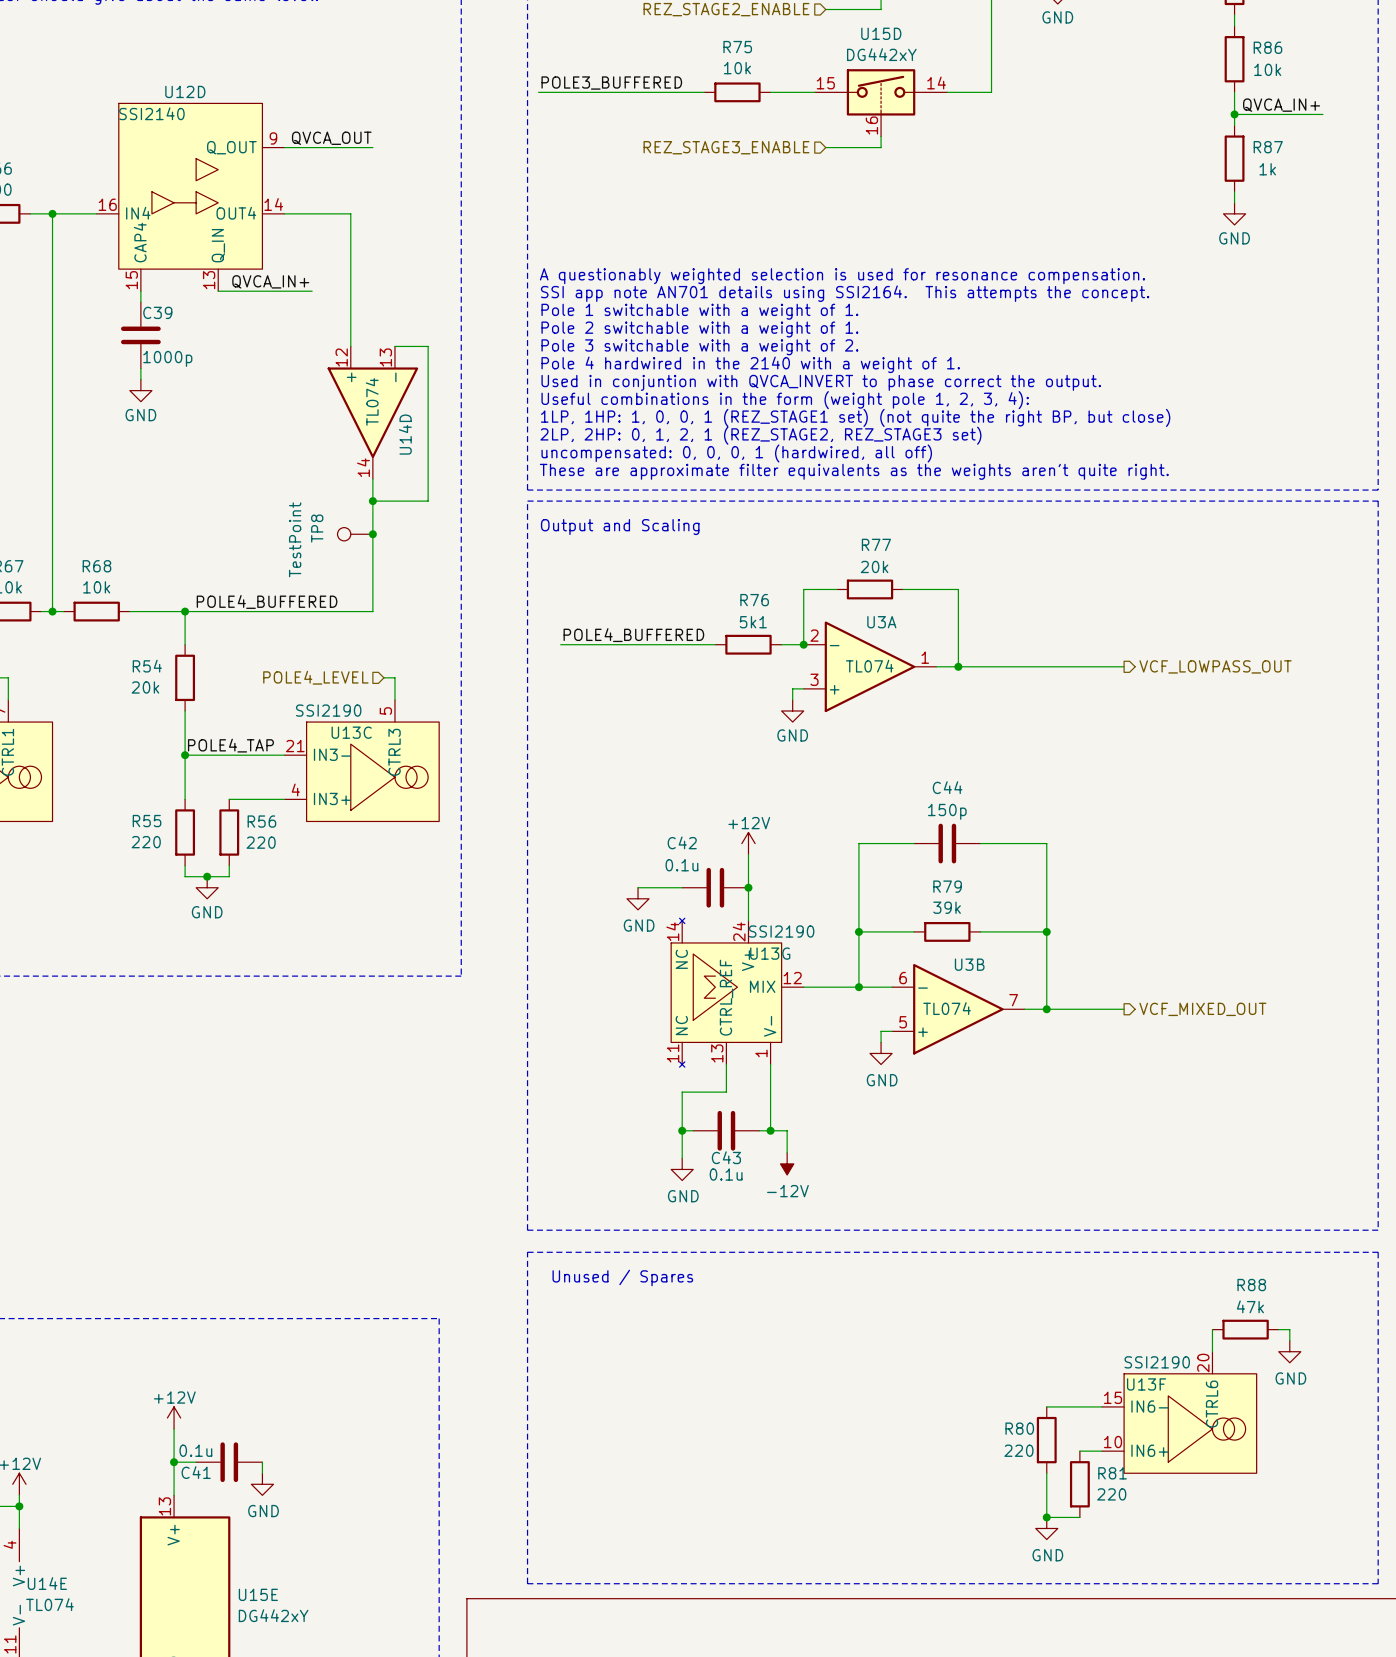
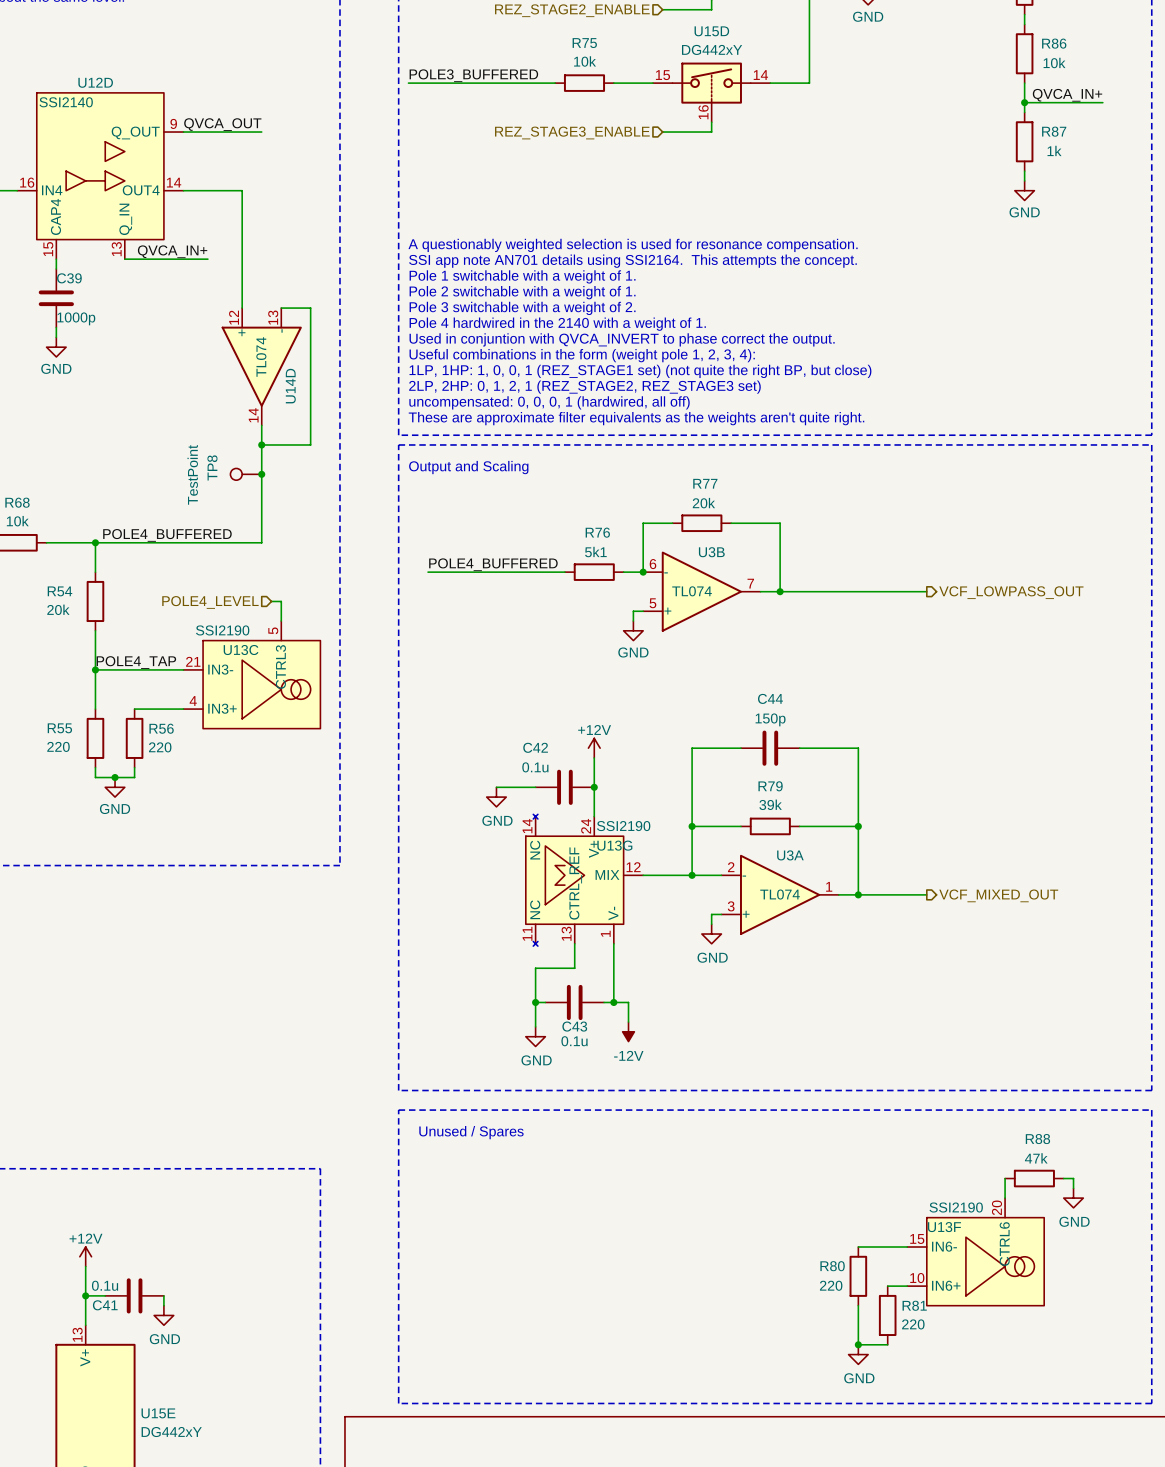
U3A position: (870, 666) -> (780, 894)
U3B position: (958, 1009) -> (701, 591)

